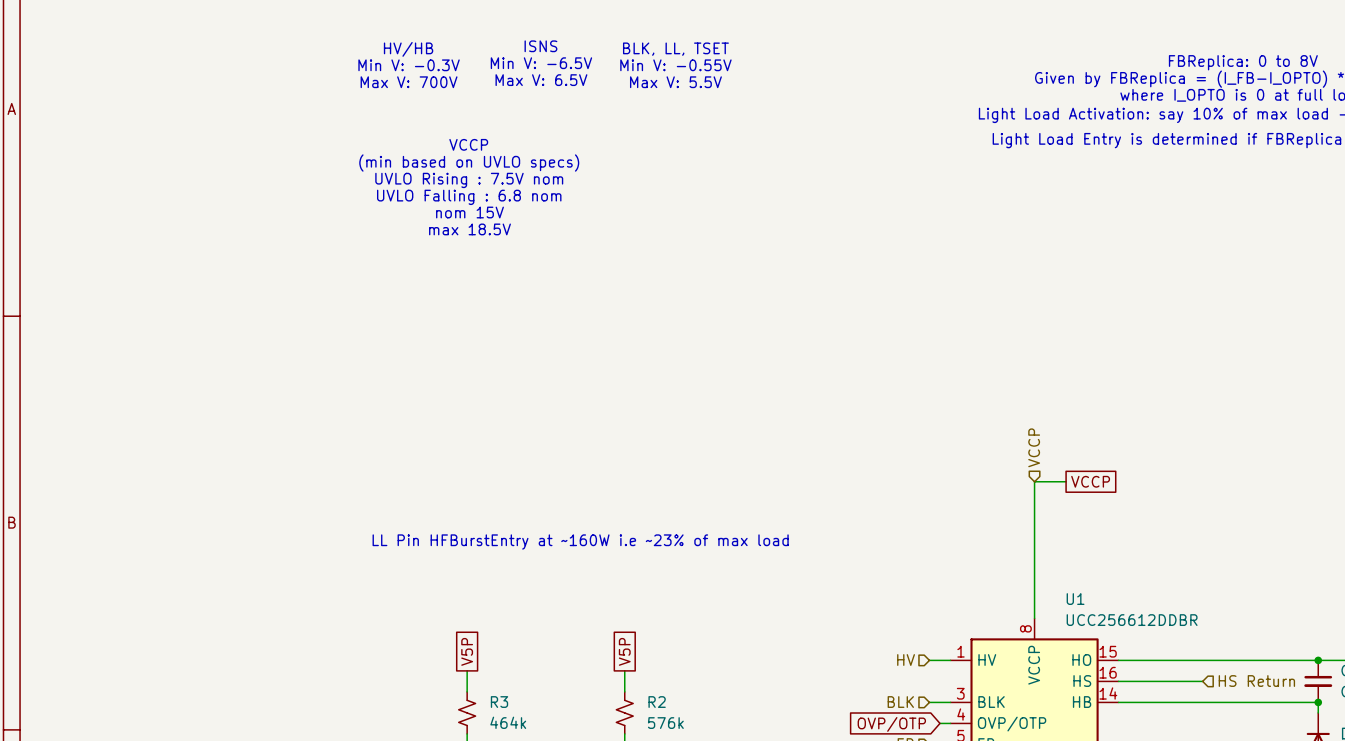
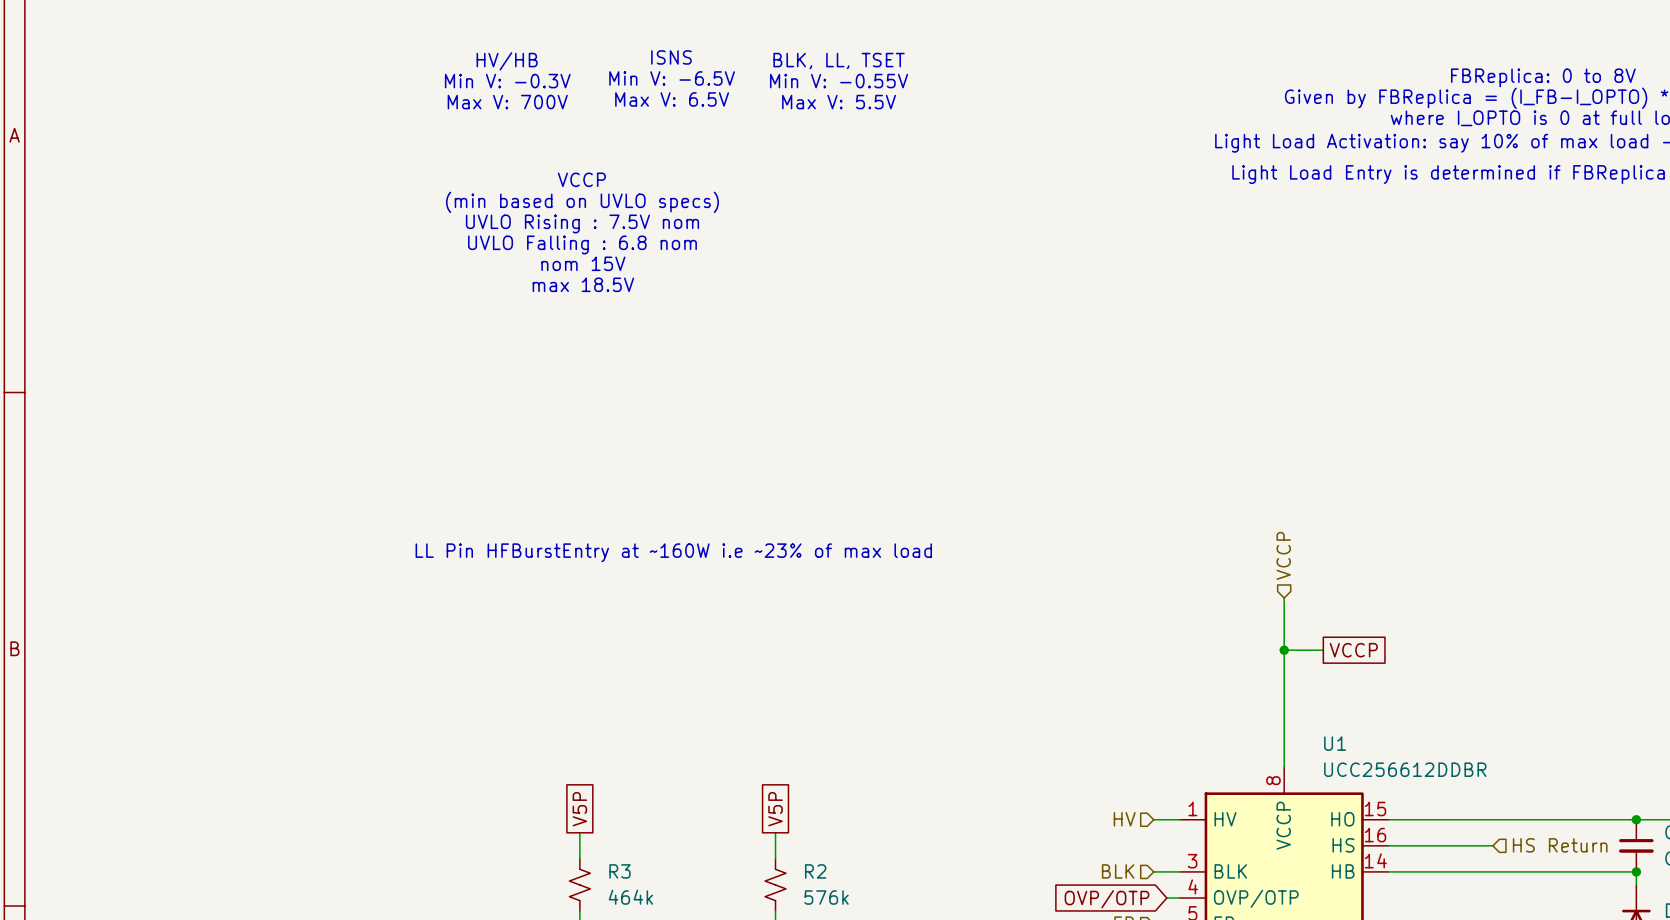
wire: (1034, 481) (1066, 481) -> (1284, 650) (1323, 650)
global label position: VCCP (1090, 481) -> VCCP (1353, 650)
junction: none -> (1284, 650)
text position: LL Pin HFBurstEntry at ~160W i.e ~23% of max load (580, 542) -> LL Pin HFBurstEntry at ~160W i.e ~23% of max load (673, 552)

